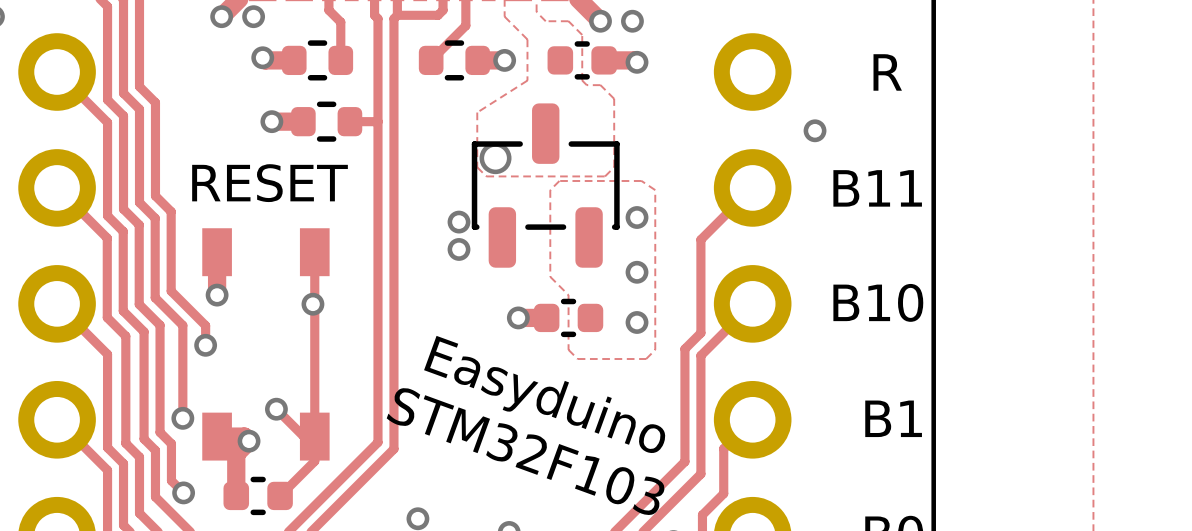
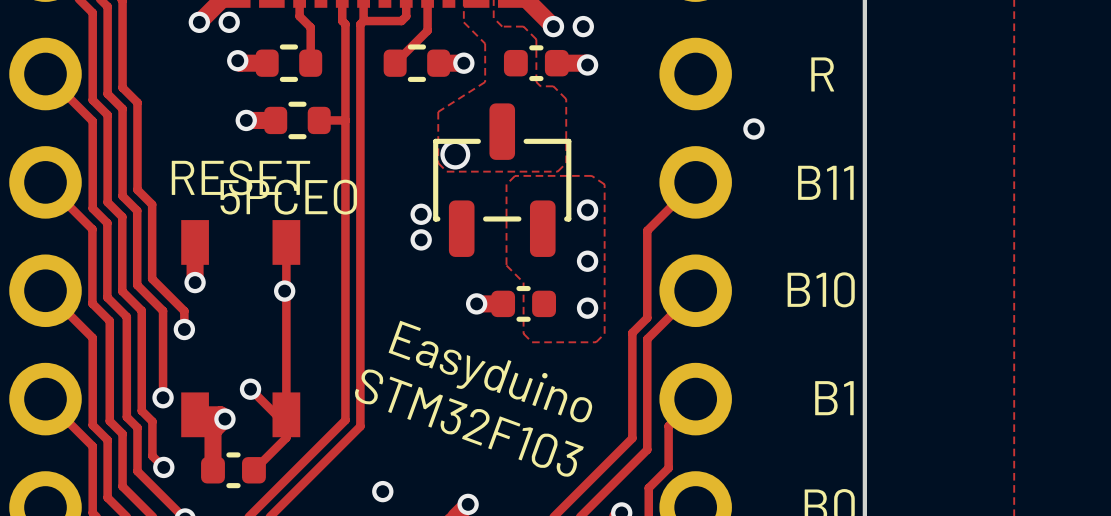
part text: none -> 5PCEO (288, 197)

